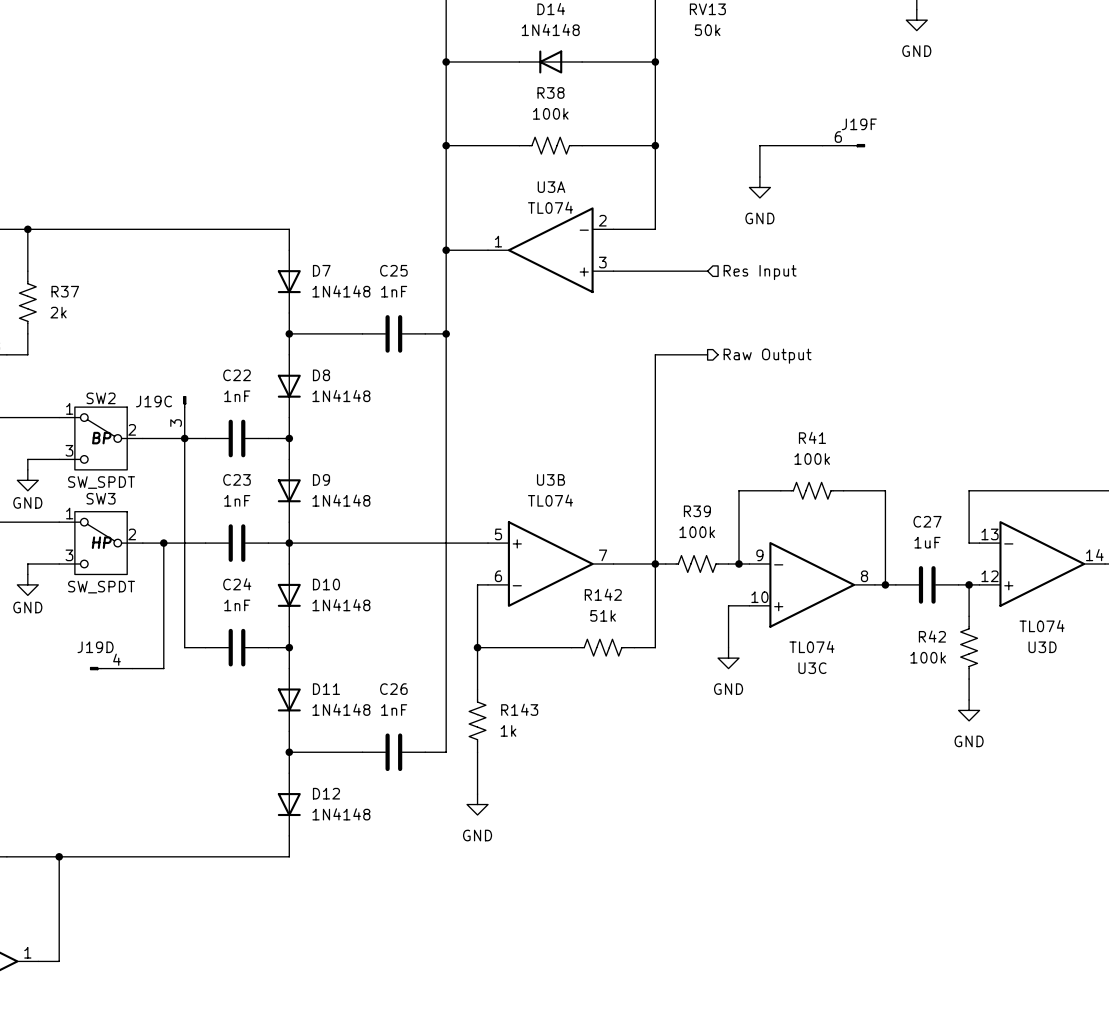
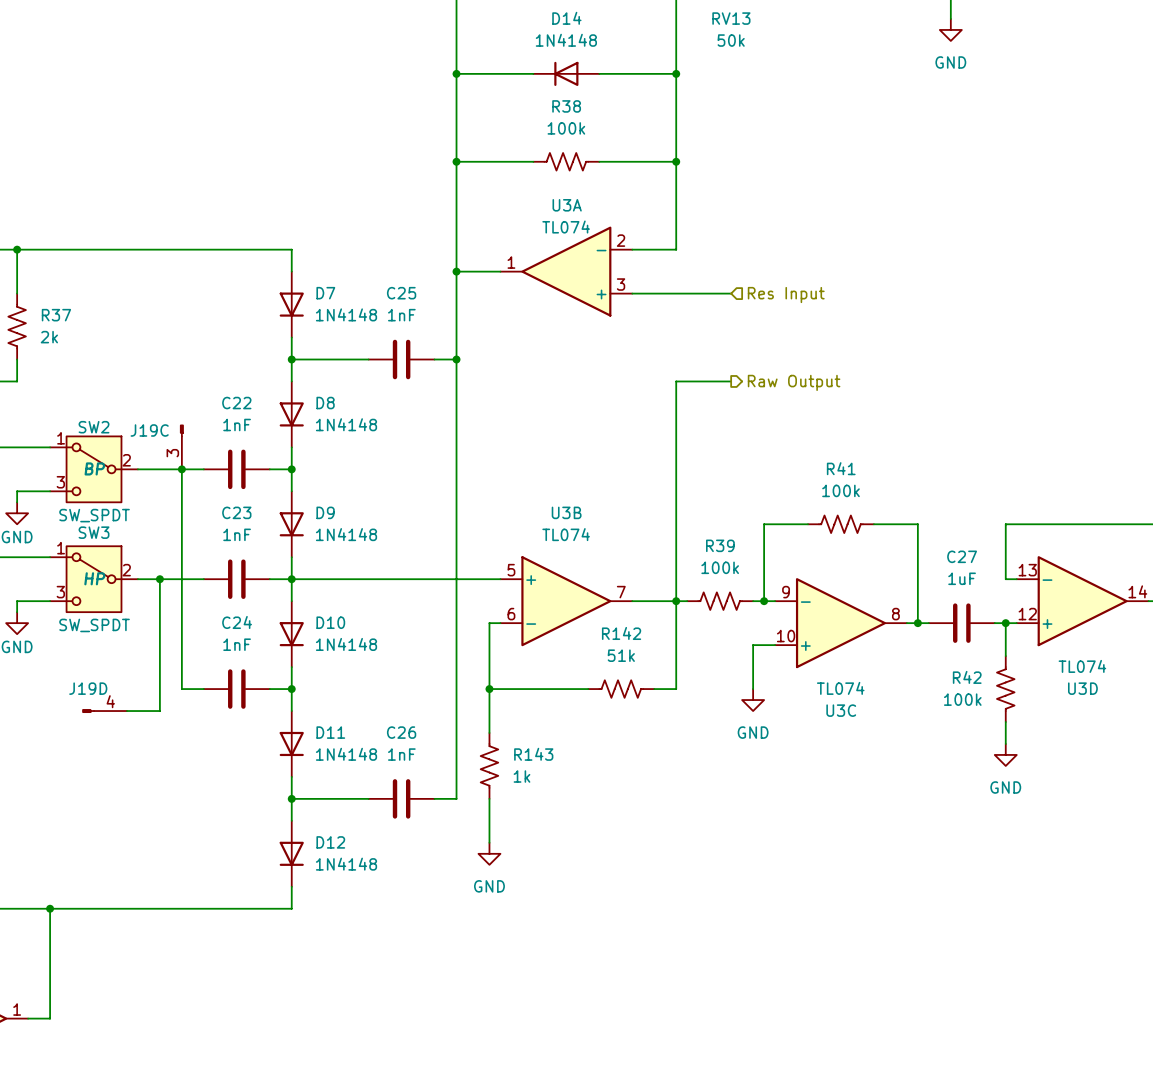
wire: (822, 145) (759, 145) (759, 177) -> none
J19F: (843, 145) -> none
power symbol: GND (759, 187) -> none

